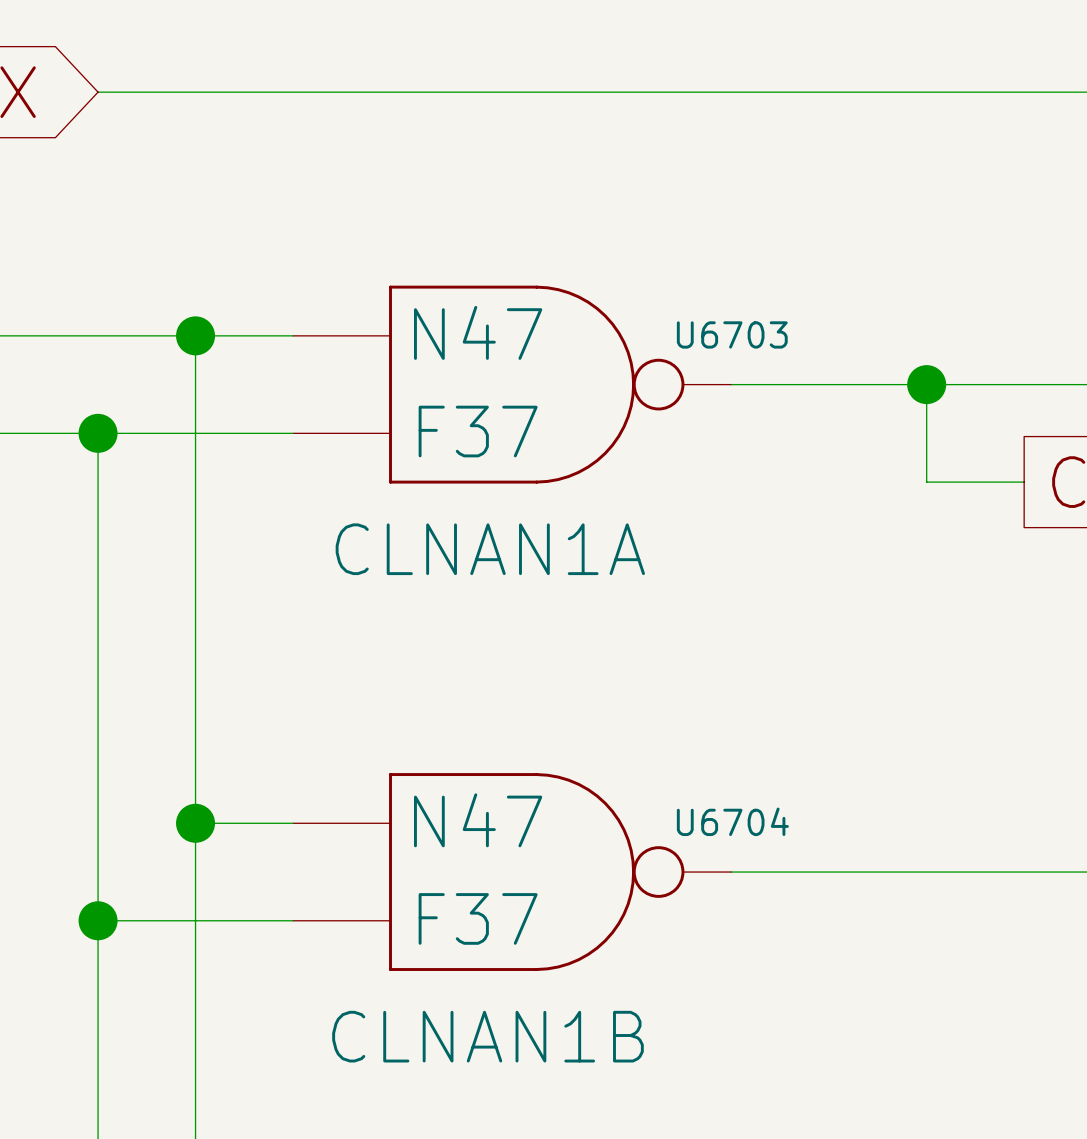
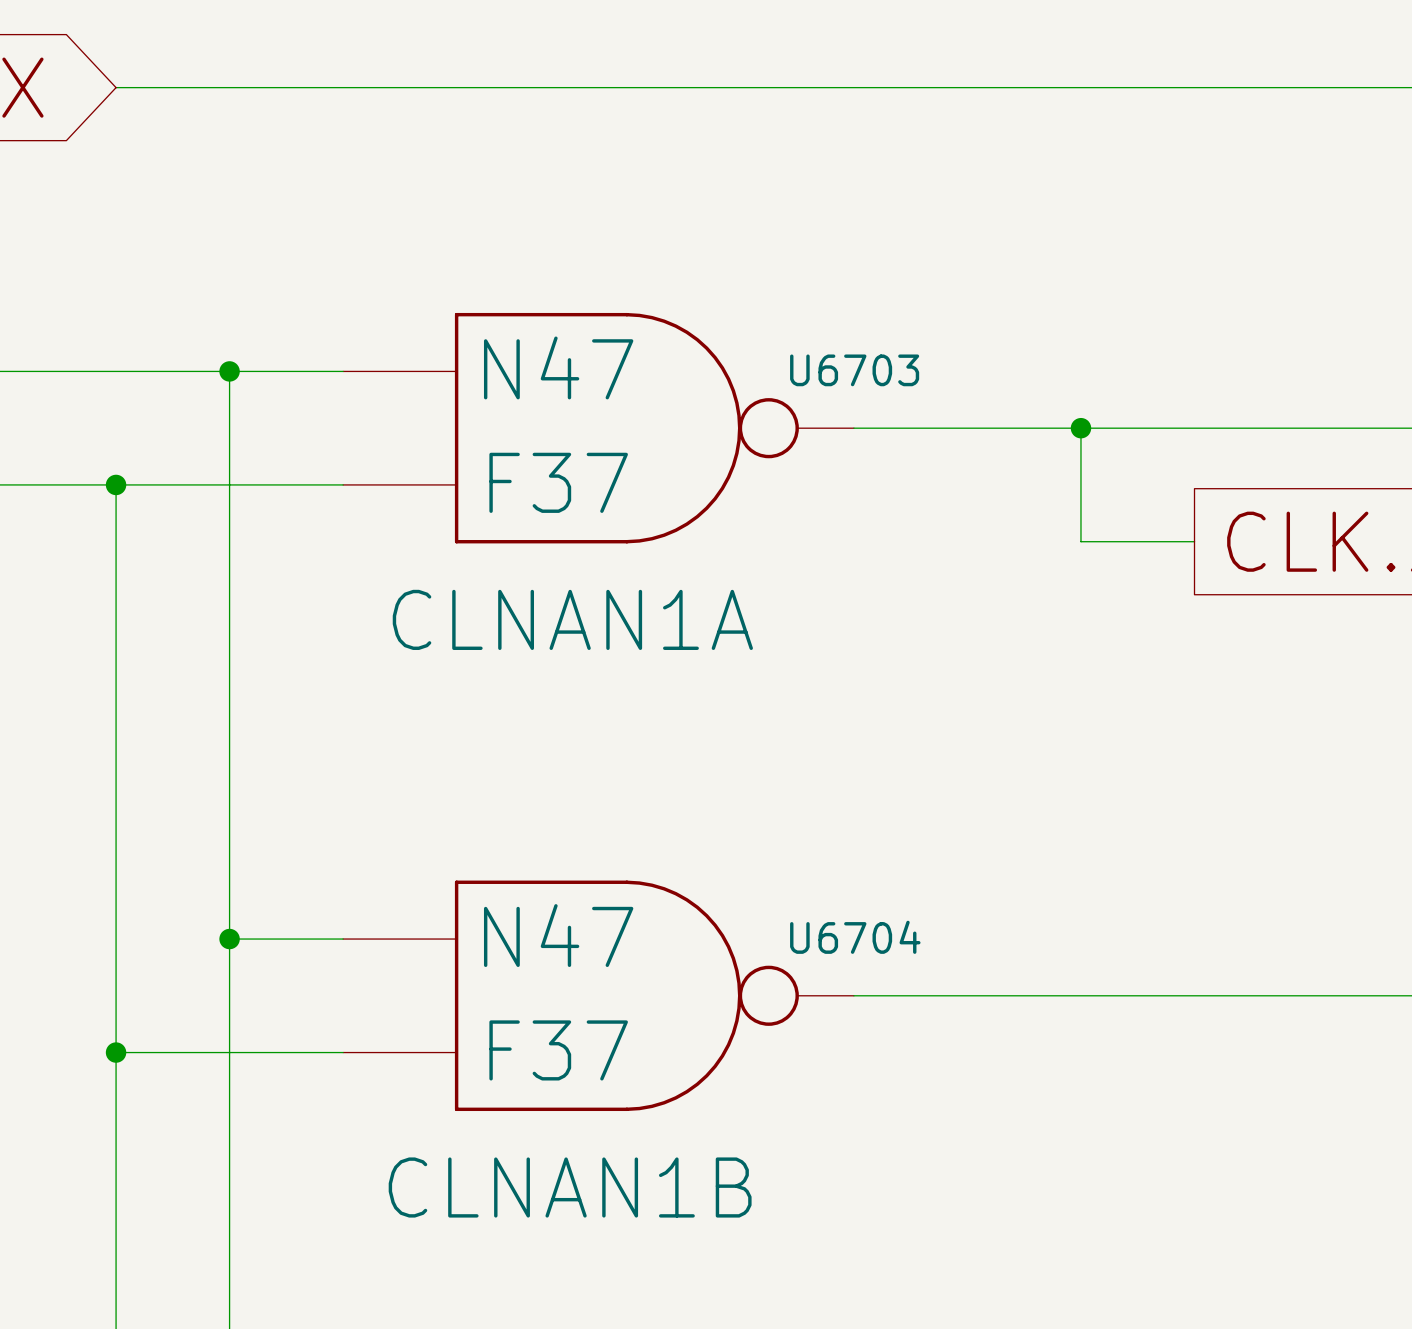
junction size: [176, 316, 216, 356] -> [219, 361, 240, 382]
junction size: [907, 365, 947, 405] -> [1070, 417, 1092, 439]
junction size: [78, 413, 118, 453] -> [105, 474, 127, 496]
junction size: [176, 803, 216, 843] -> [219, 928, 240, 950]
junction size: [78, 901, 118, 941] -> [105, 1042, 127, 1063]

